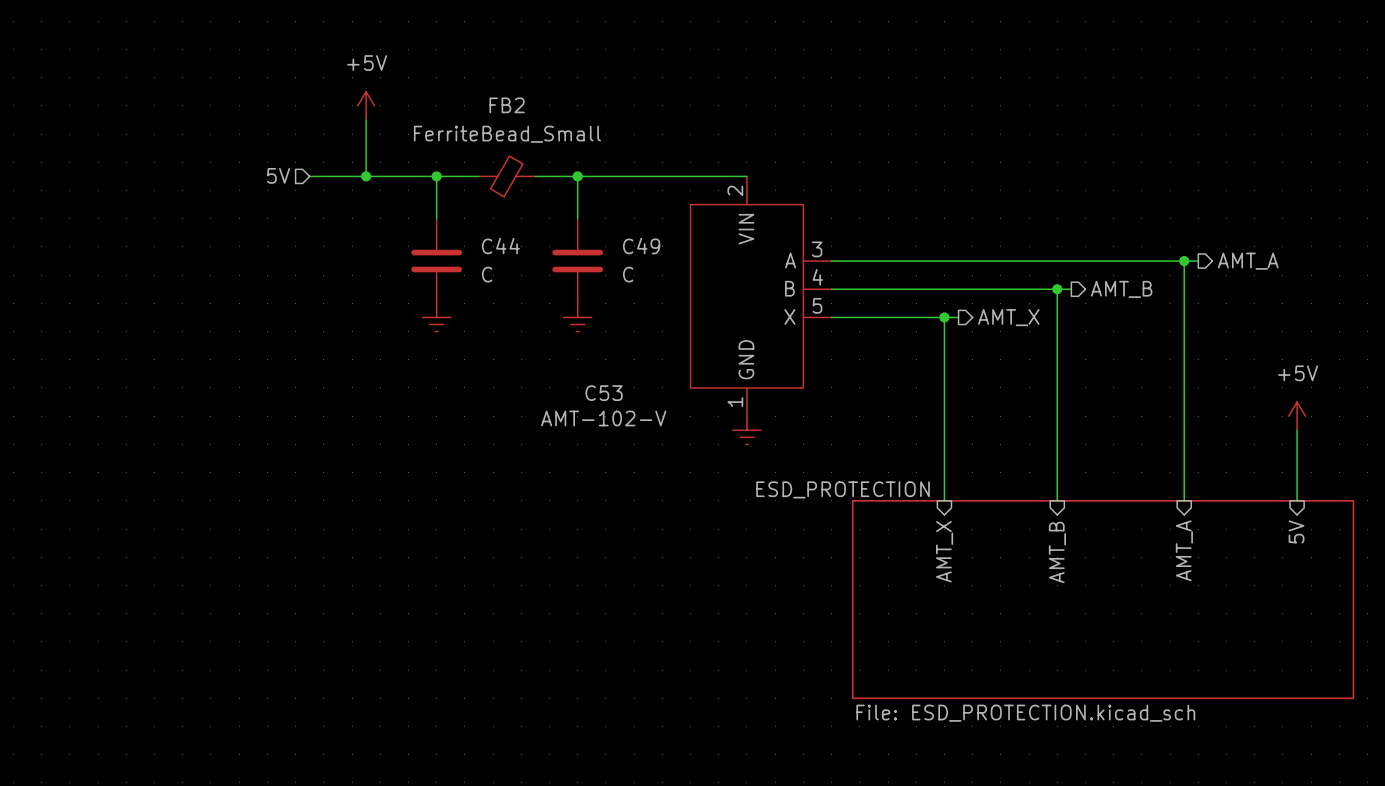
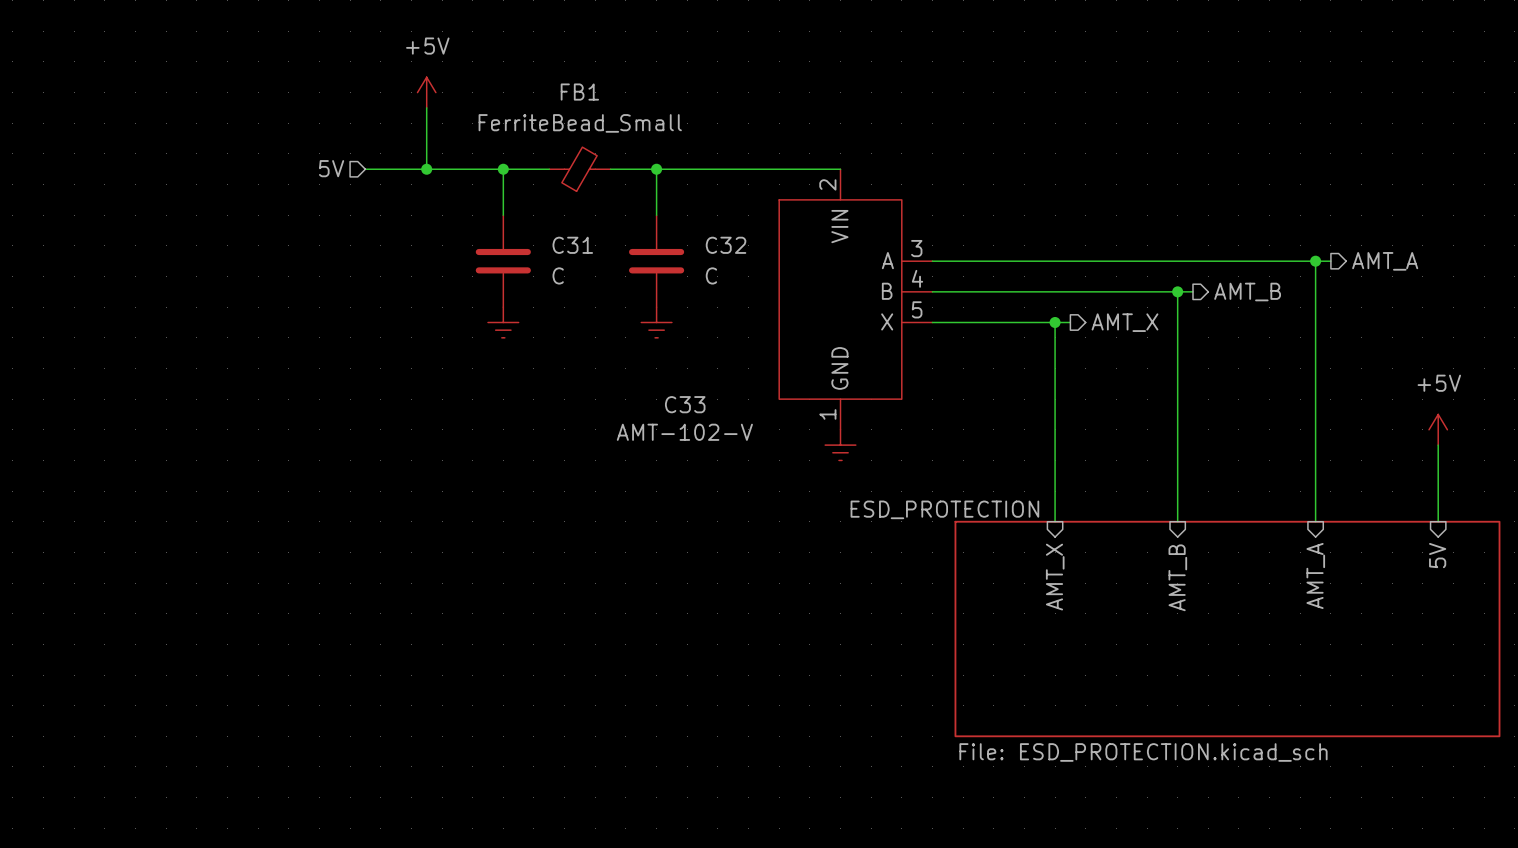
FB2 name: FB2 (507, 105) -> FB1 (579, 92)
C44 name: C44 (500, 246) -> C31 (572, 245)
C49 name: C49 (641, 246) -> C32 (726, 245)
C53 name: C53 (604, 393) -> C33 (685, 404)

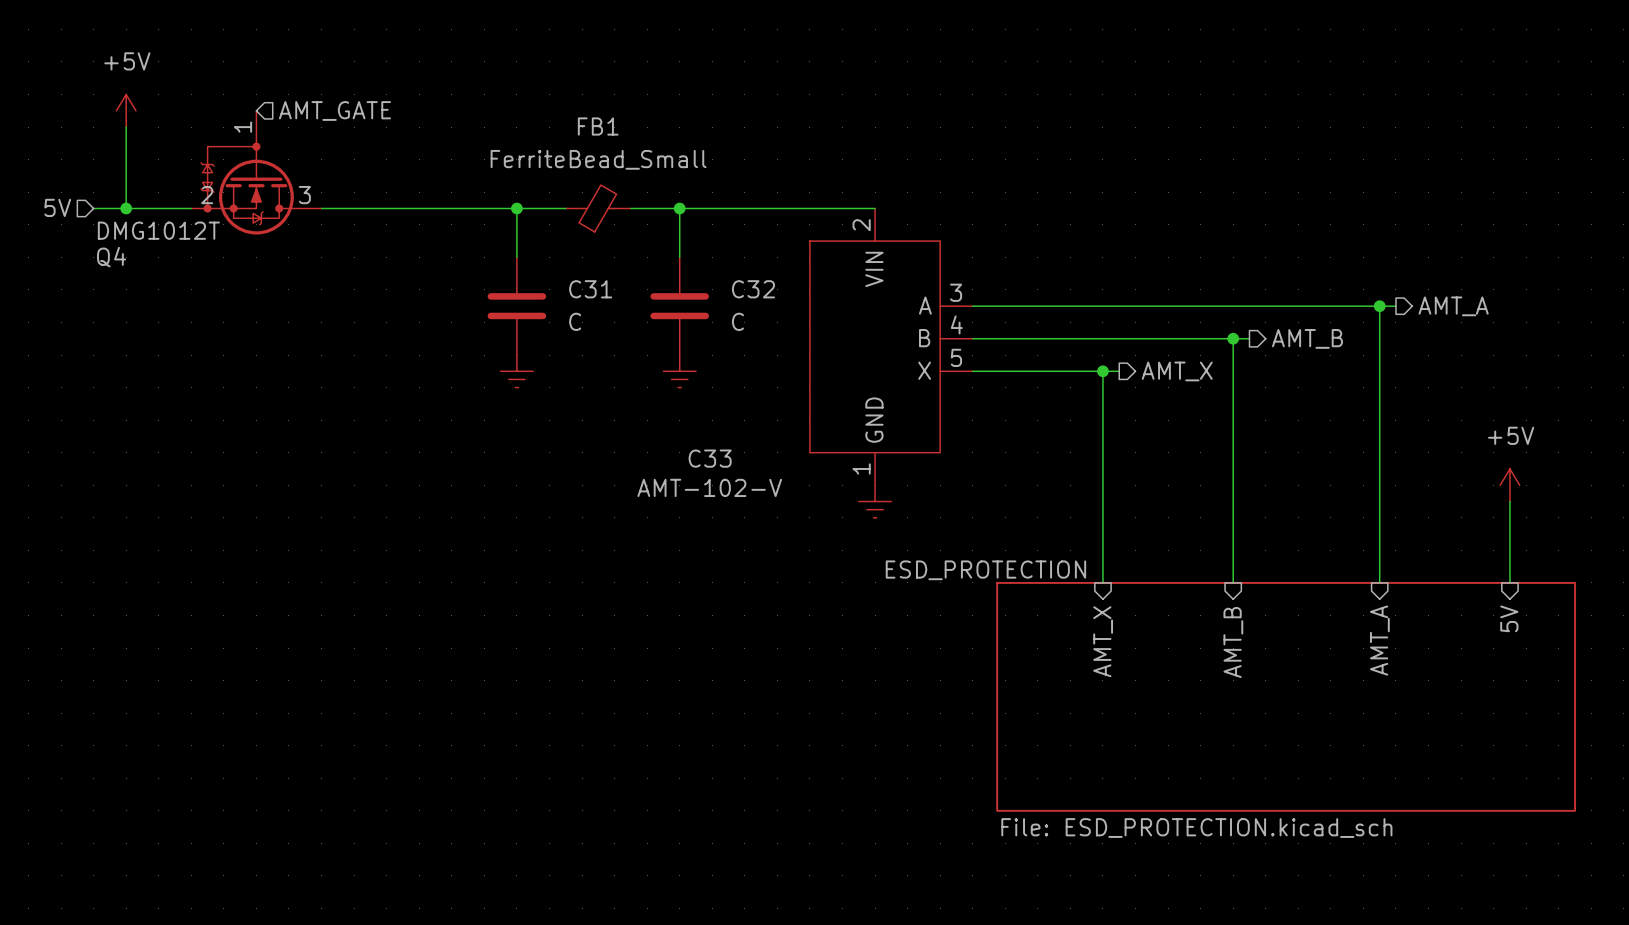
hierarchical label: none -> AMT_GATE (334, 110)
wire: none -> (126, 127) (126, 208)
power symbol position: +5V (426, 92) -> +5V (126, 110)
wire: (426, 107) (426, 169) -> none
Q4: none -> DMG1012T (256, 172)
hierarchical label position: 5V (331, 168) -> 5V (57, 207)
wire: none -> (93, 208) (191, 208)
junction: none -> (126, 208)
wire: none -> (321, 208) (370, 208)
junction: (426, 169) -> none

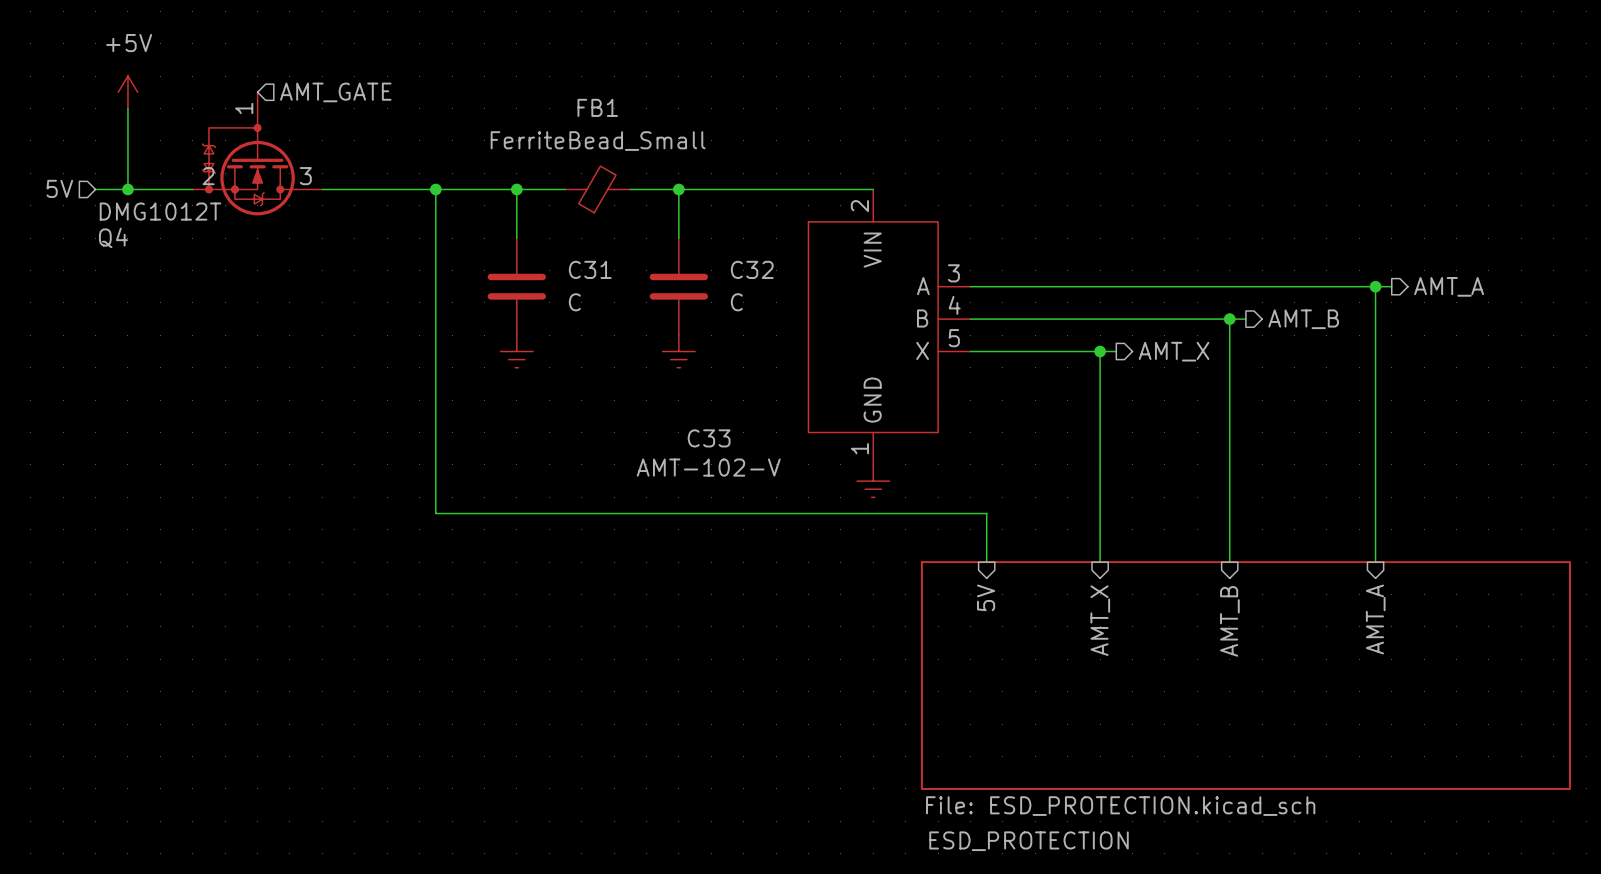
wire: none -> (435, 189) (435, 513) (986, 513) (986, 562)
junction: none -> (435, 189)
power symbol: +5V (1509, 485) -> none
wire: (1509, 501) (1509, 582) -> none
sheet pin: none -> 5V (986, 597)
sheet pin: 5V (1509, 618) -> none
sheet ESD_PROTECTION: none -> File: ESD_PROTECTION.kicad_sch (1245, 675)
sheet ESD_PROTECTION: File: ESD_PROTECTION.kicad_sch (1286, 696) -> none

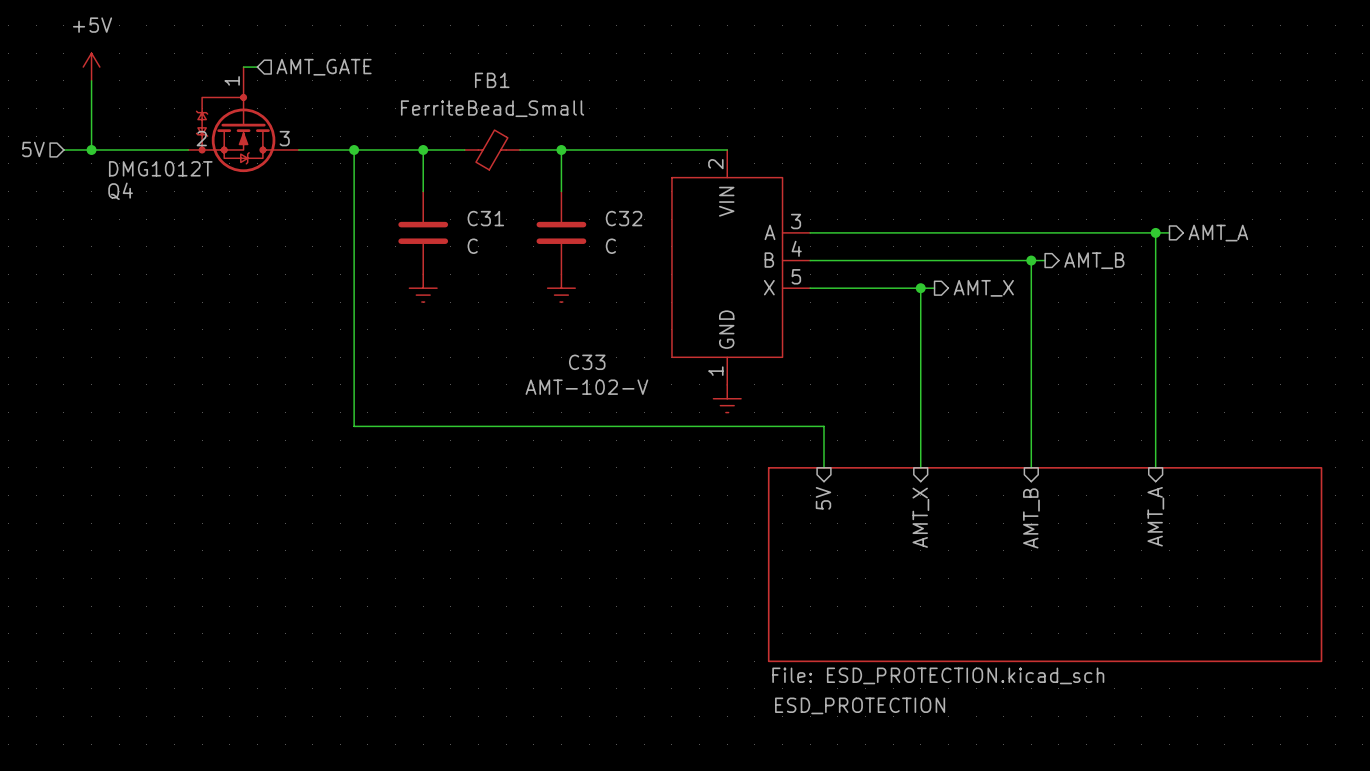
wire: none -> (243, 67) (257, 67)
hierarchical label position: AMT_GATE (335, 92) -> AMT_GATE (324, 67)
Q4 position: (257, 153) -> (243, 119)

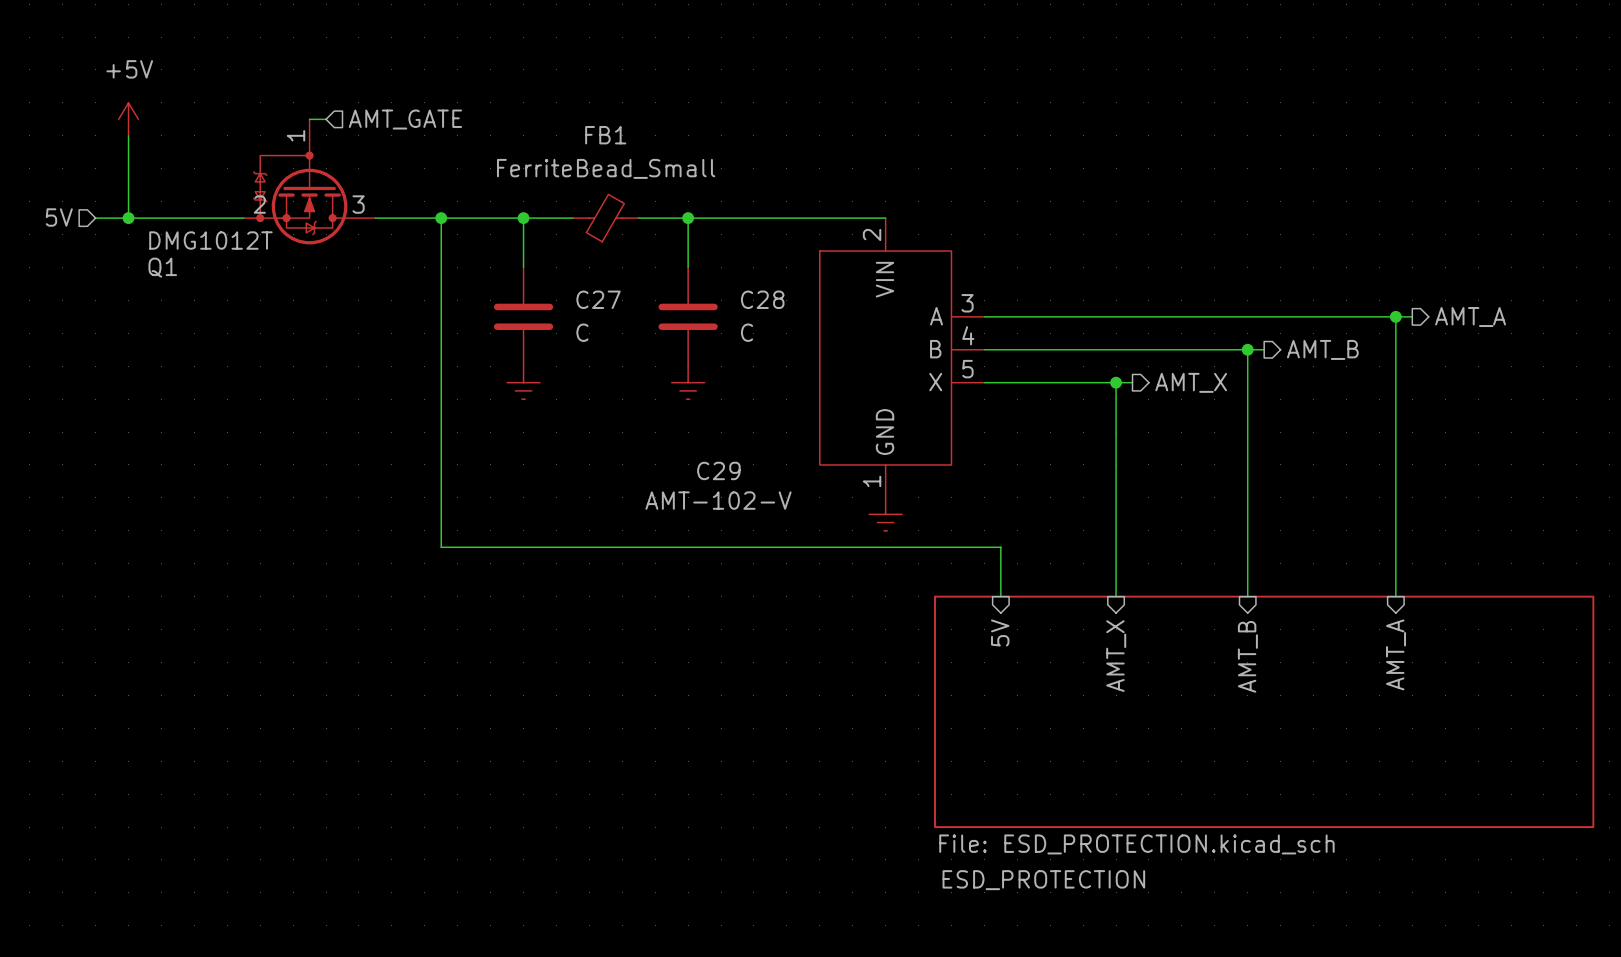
Q4 name: Q4 (120, 191) -> Q1 (162, 267)
C31 name: C31 (485, 218) -> C27 (598, 299)
C32 name: C32 (624, 218) -> C28 (762, 299)
C33 name: C33 (587, 362) -> C29 (718, 470)

